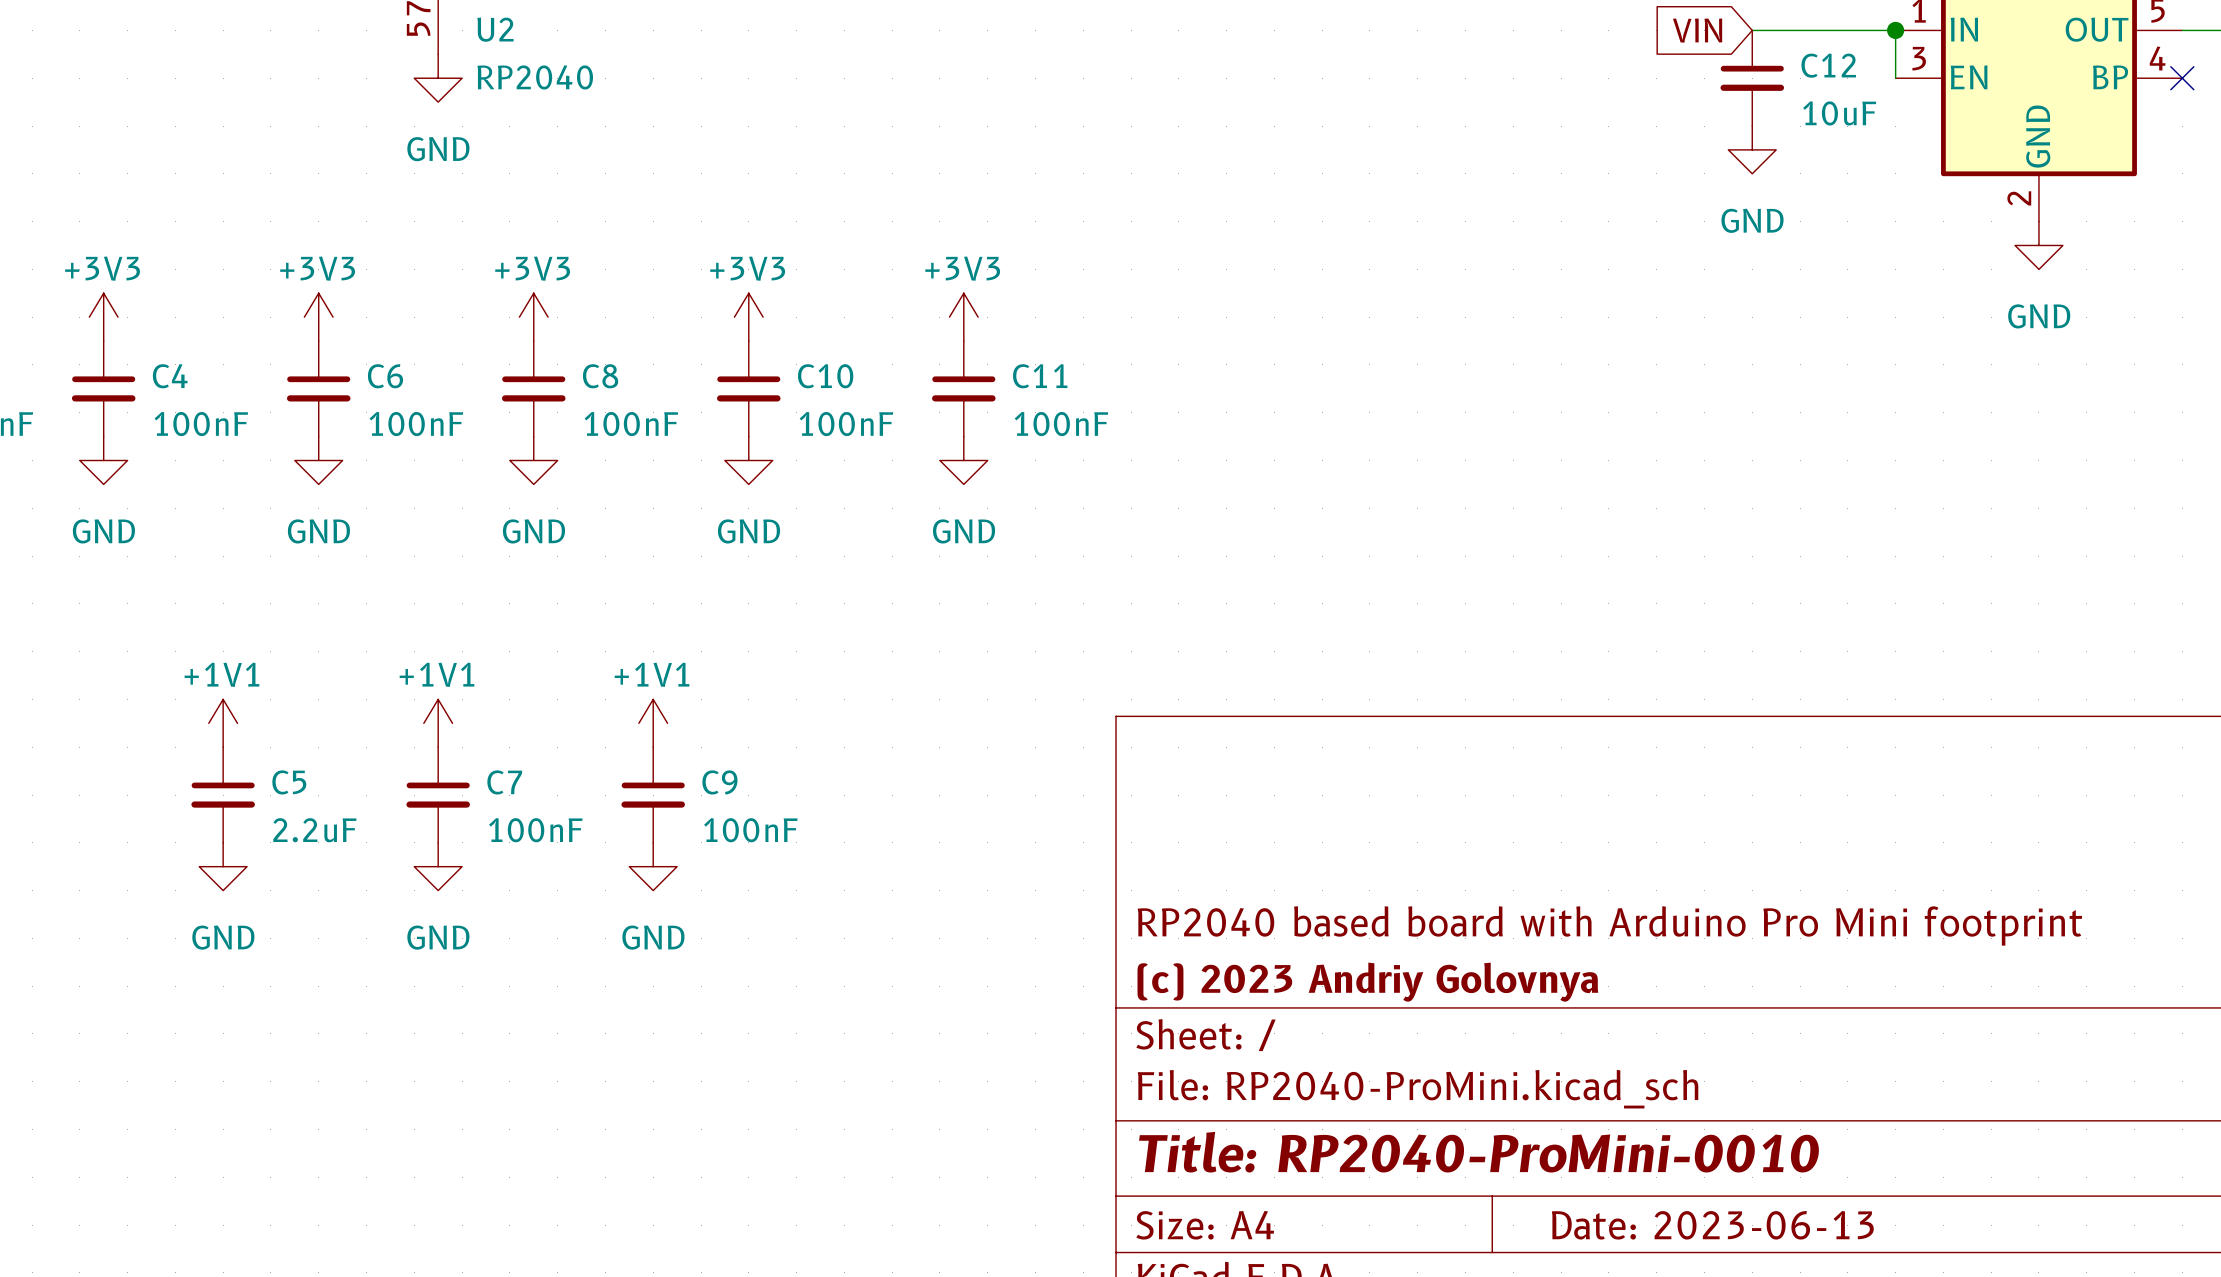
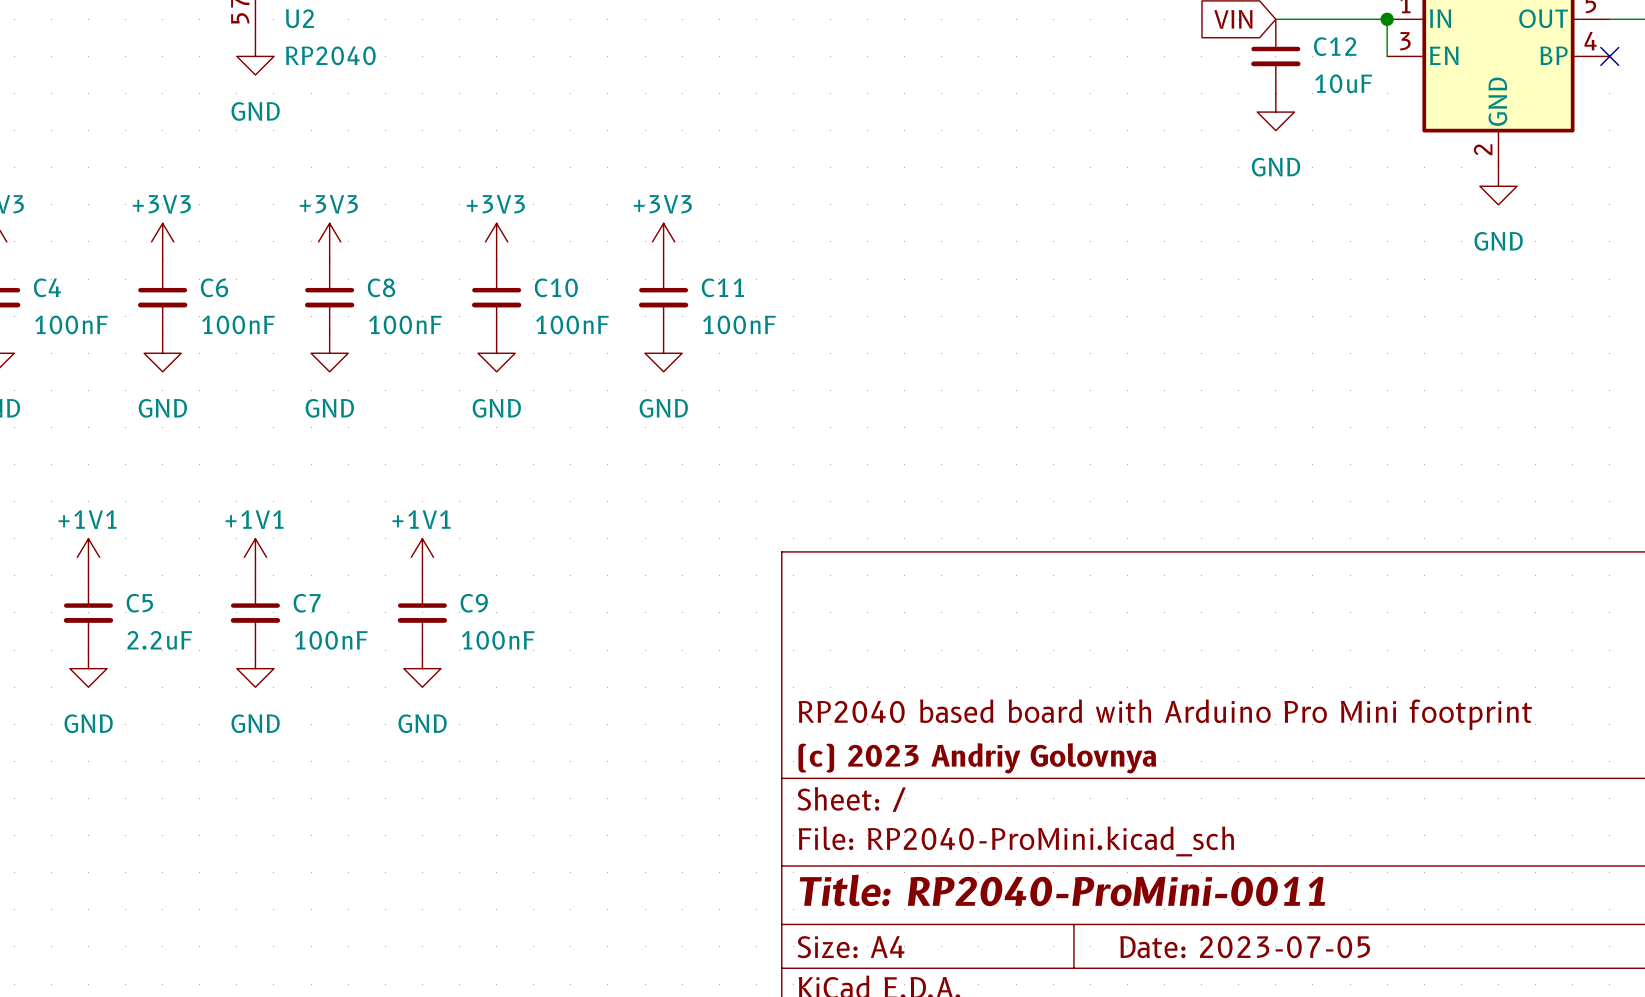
title block: Title: RP2040-ProMini-0010 (1479, 1152) -> Title: RP2040-ProMini-0011 (1062, 890)
title block: Date: 2023-06-13 (1712, 1225) -> Date: 2023-07-05 (1245, 947)

